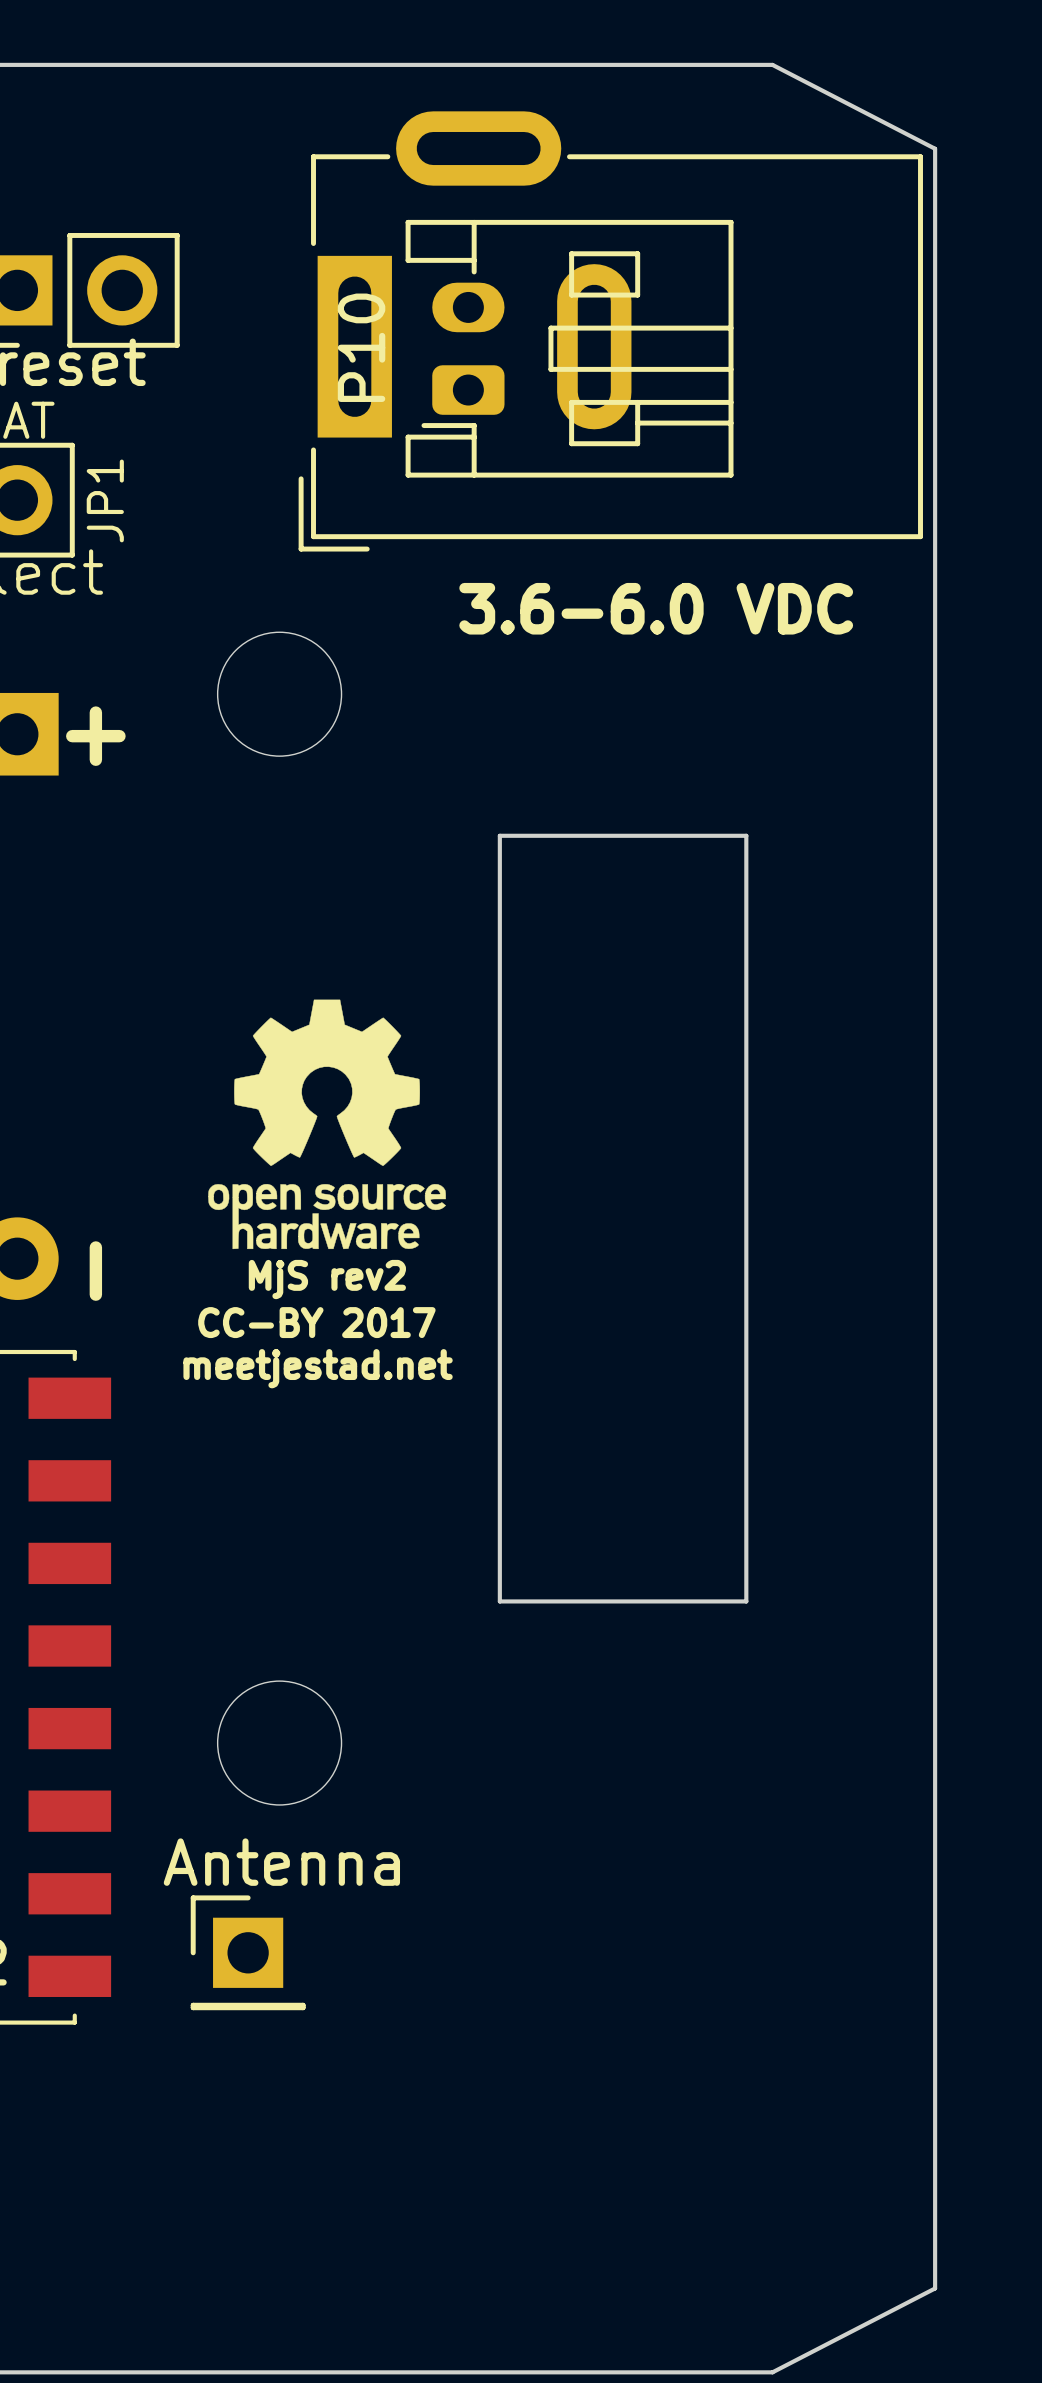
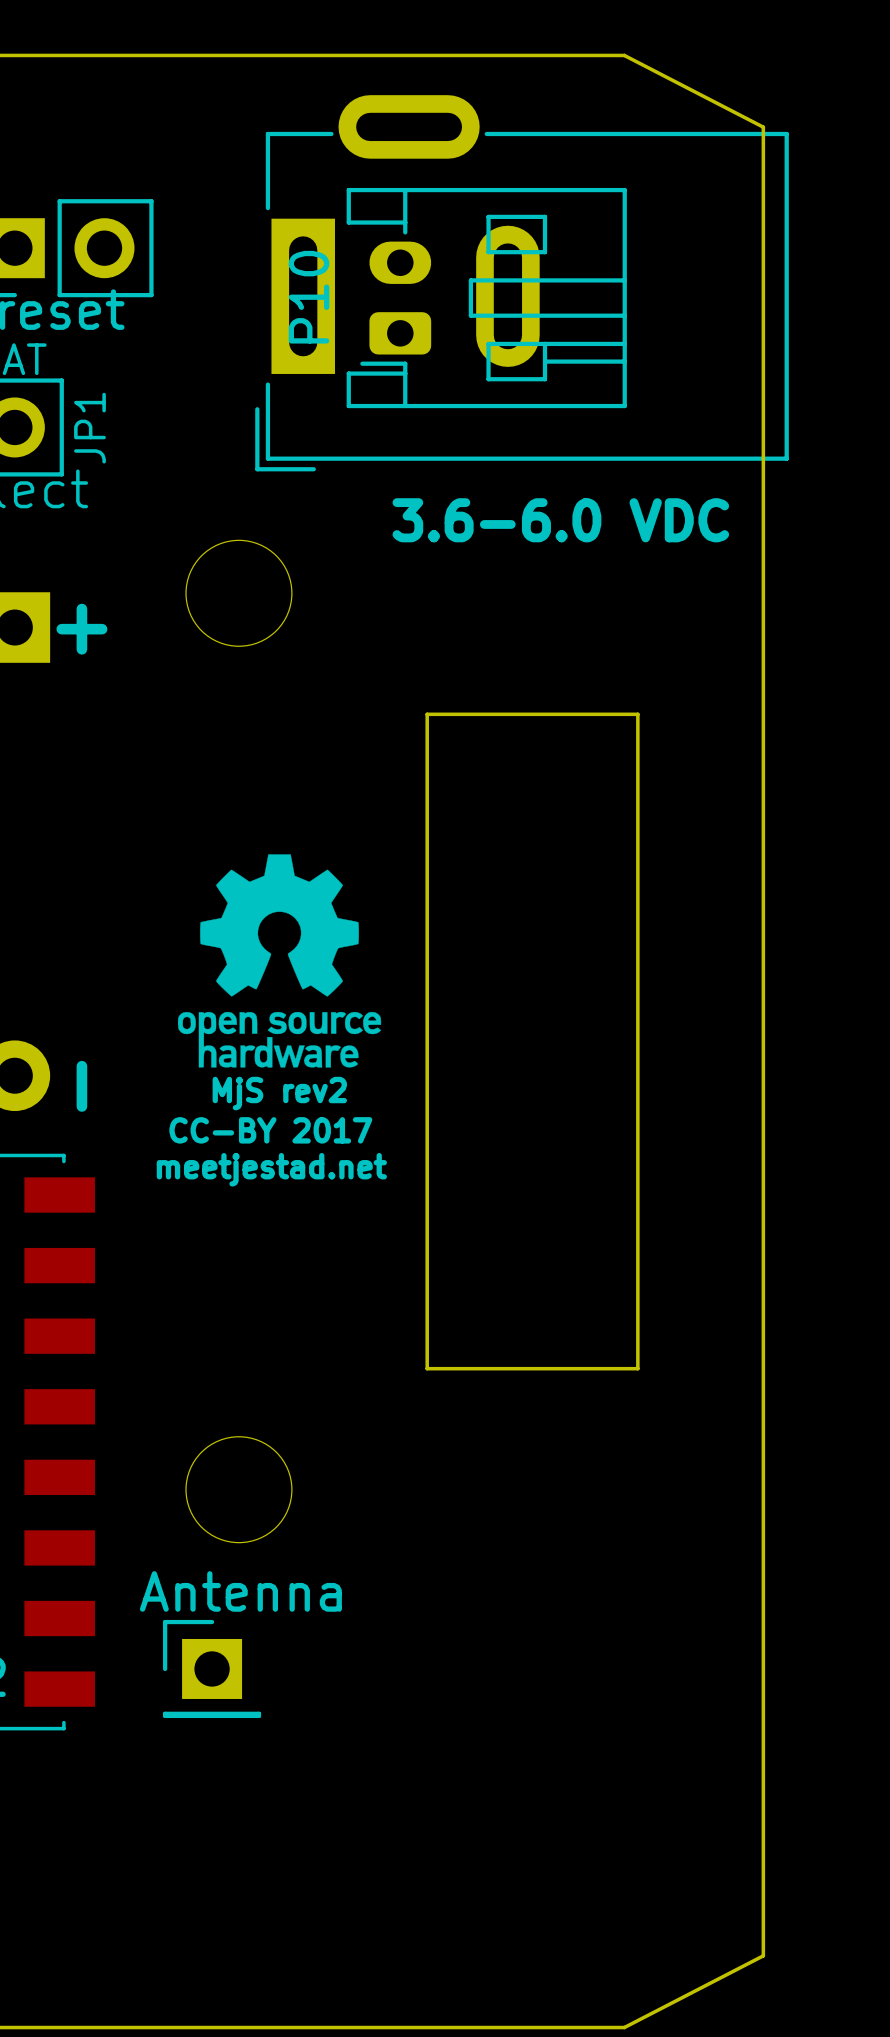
board edge: (730, 64) (772, 64) (935, 148) (935, 2288) (772, 2372) (730, 2372) -> (624, 55) (763, 127) (763, 1955) (624, 2027)

